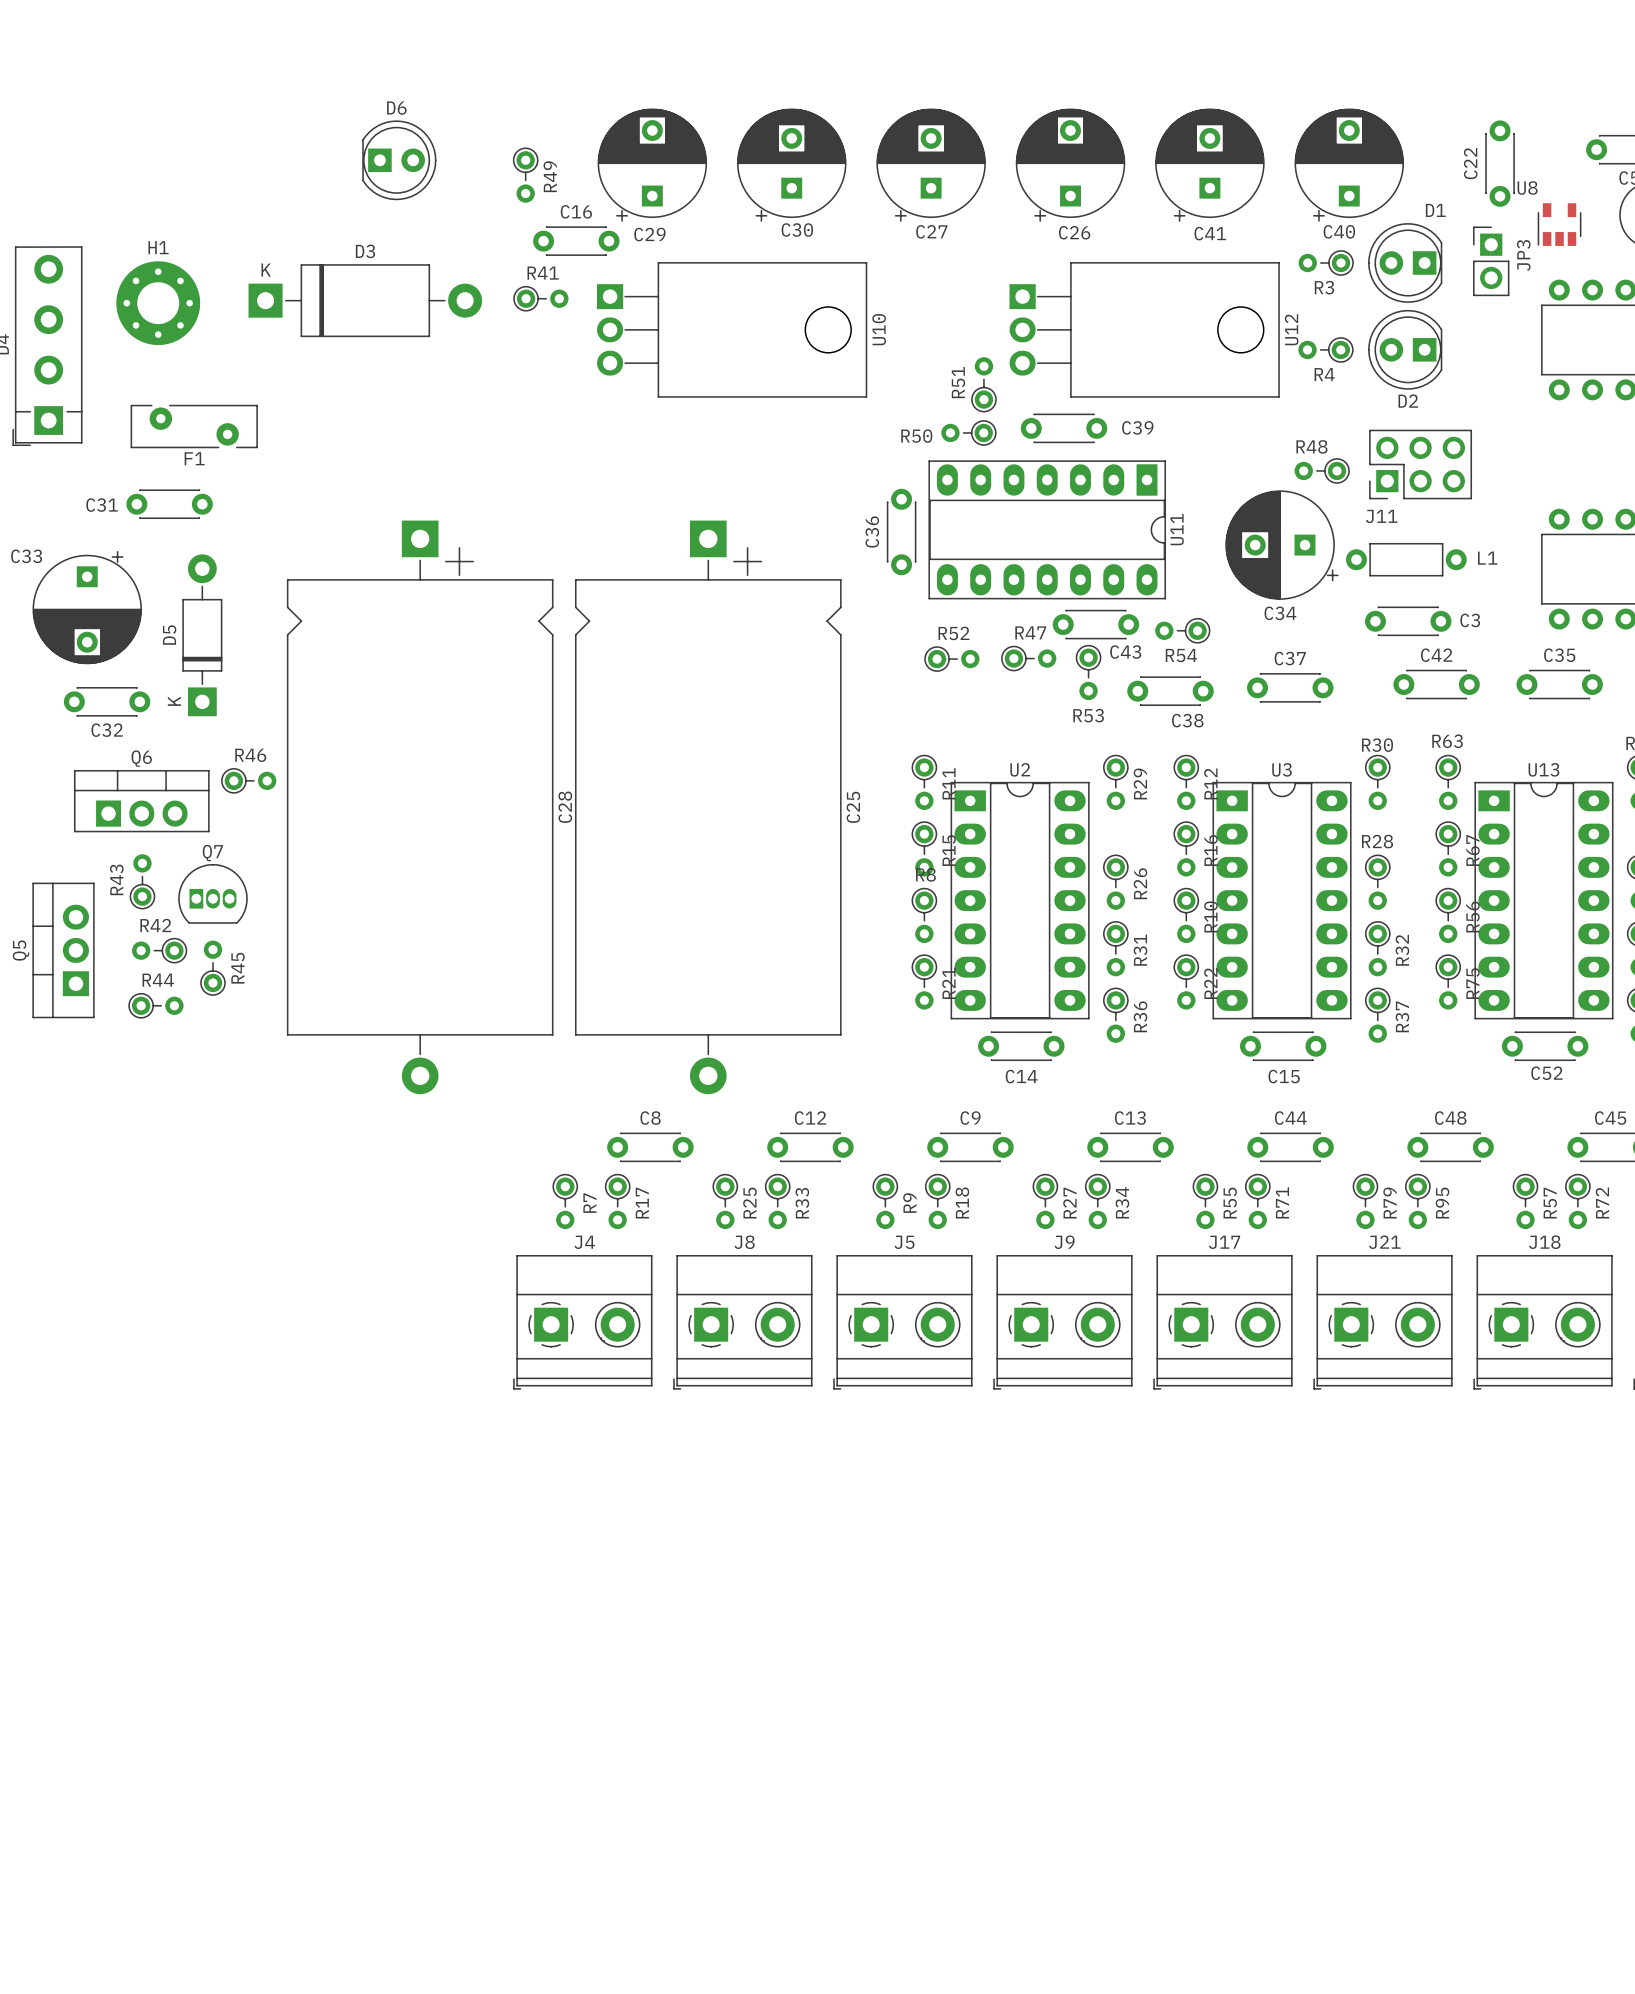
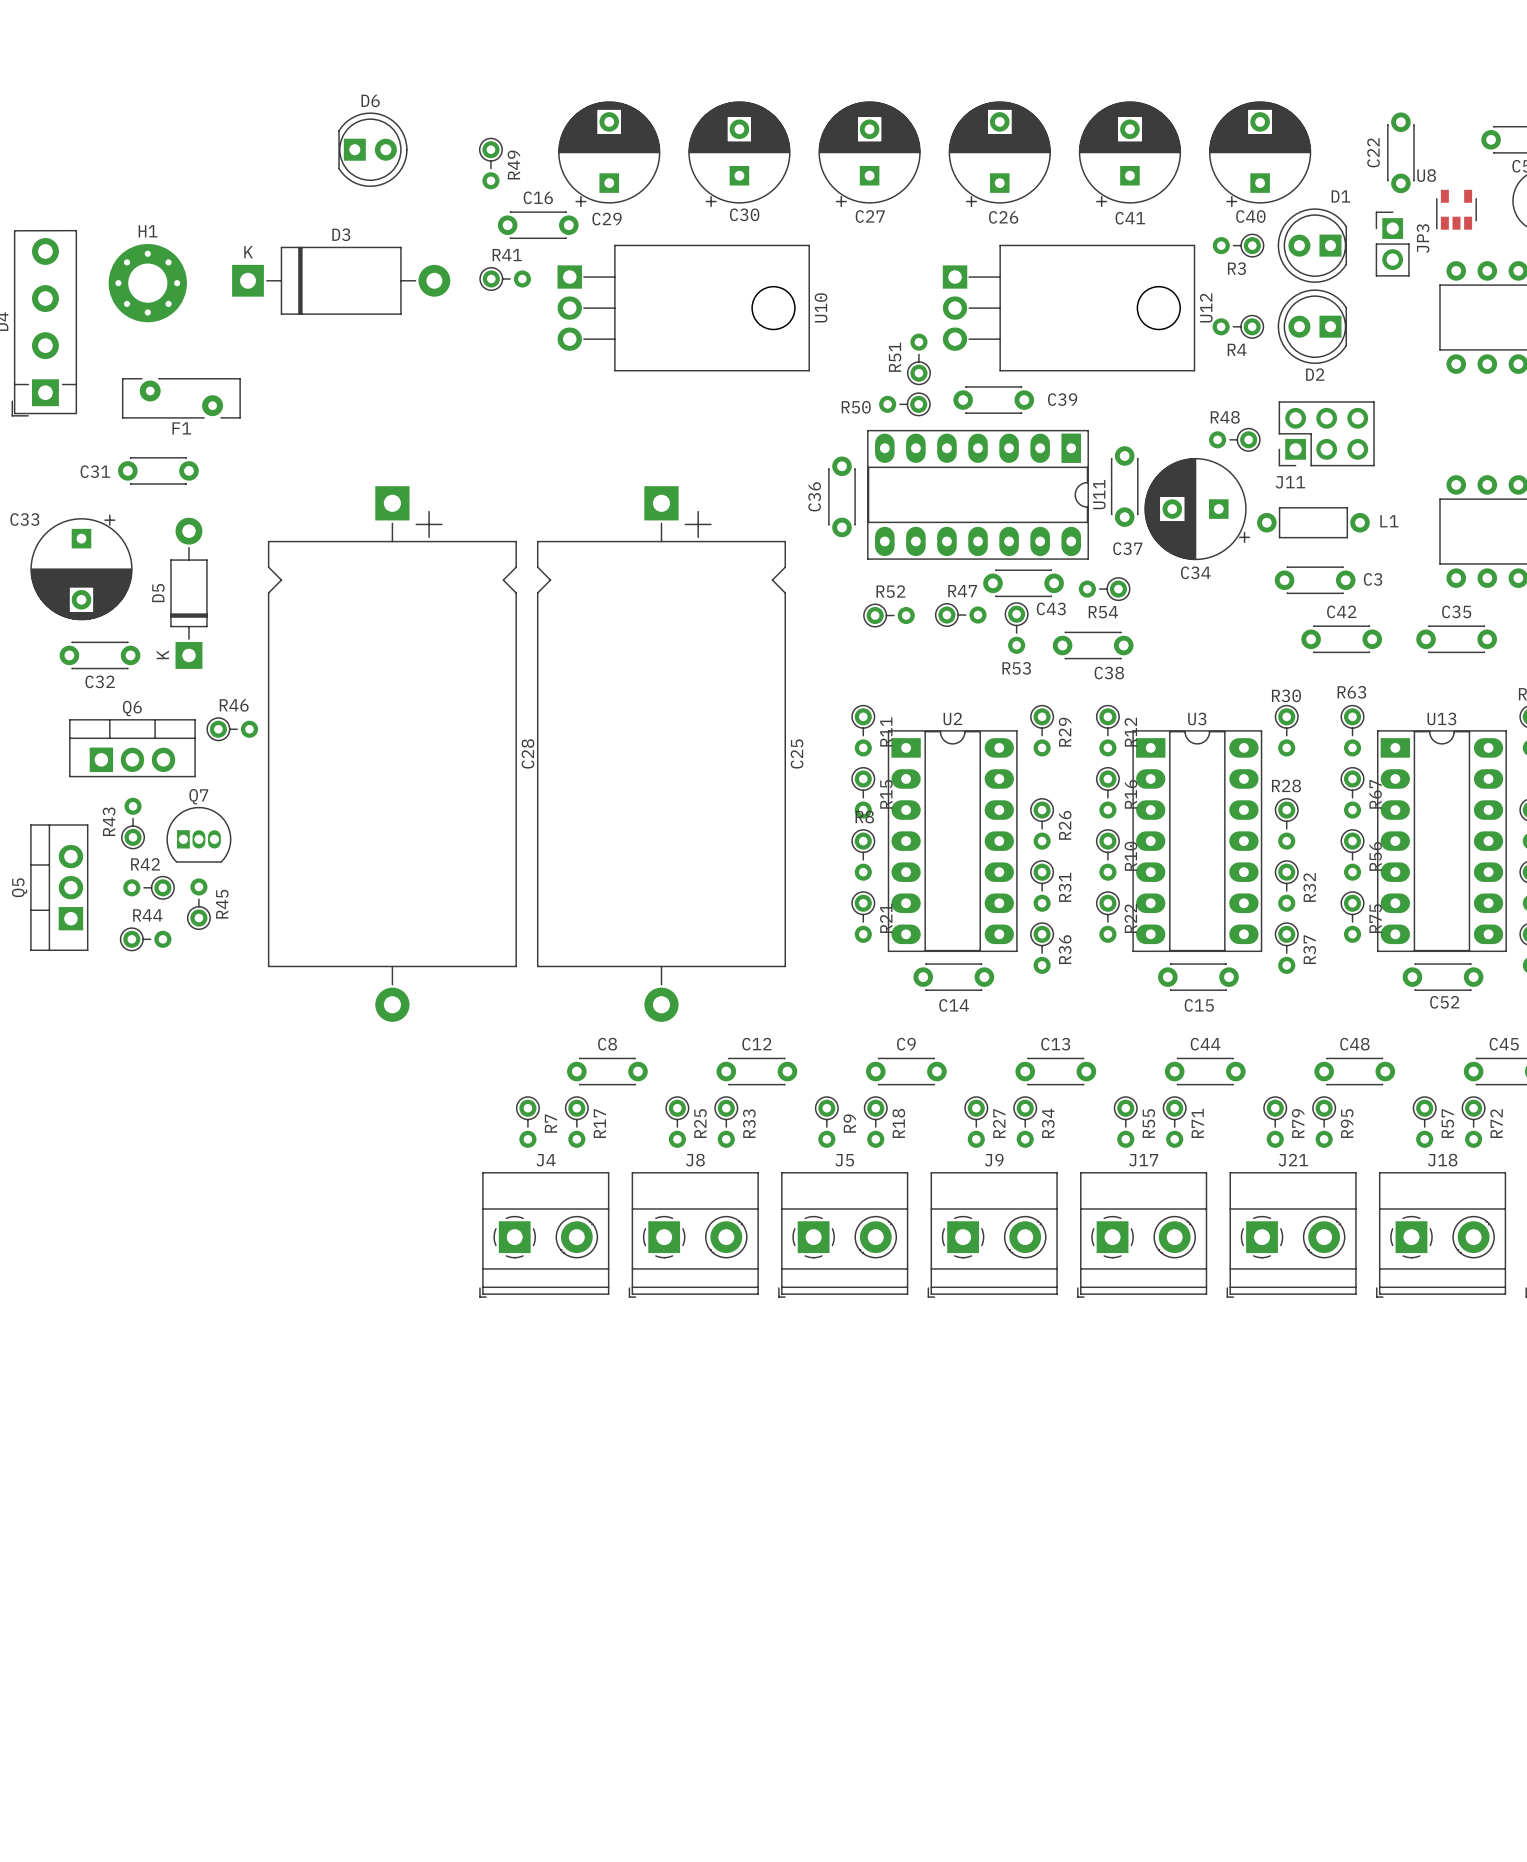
C37 name position: C37 (1290, 658) -> C37 (1127, 548)
C37 rotation: 0° (1290, 687) -> 90° clockwise (1124, 486)
C37 position: (1290, 687) -> (1124, 486)

